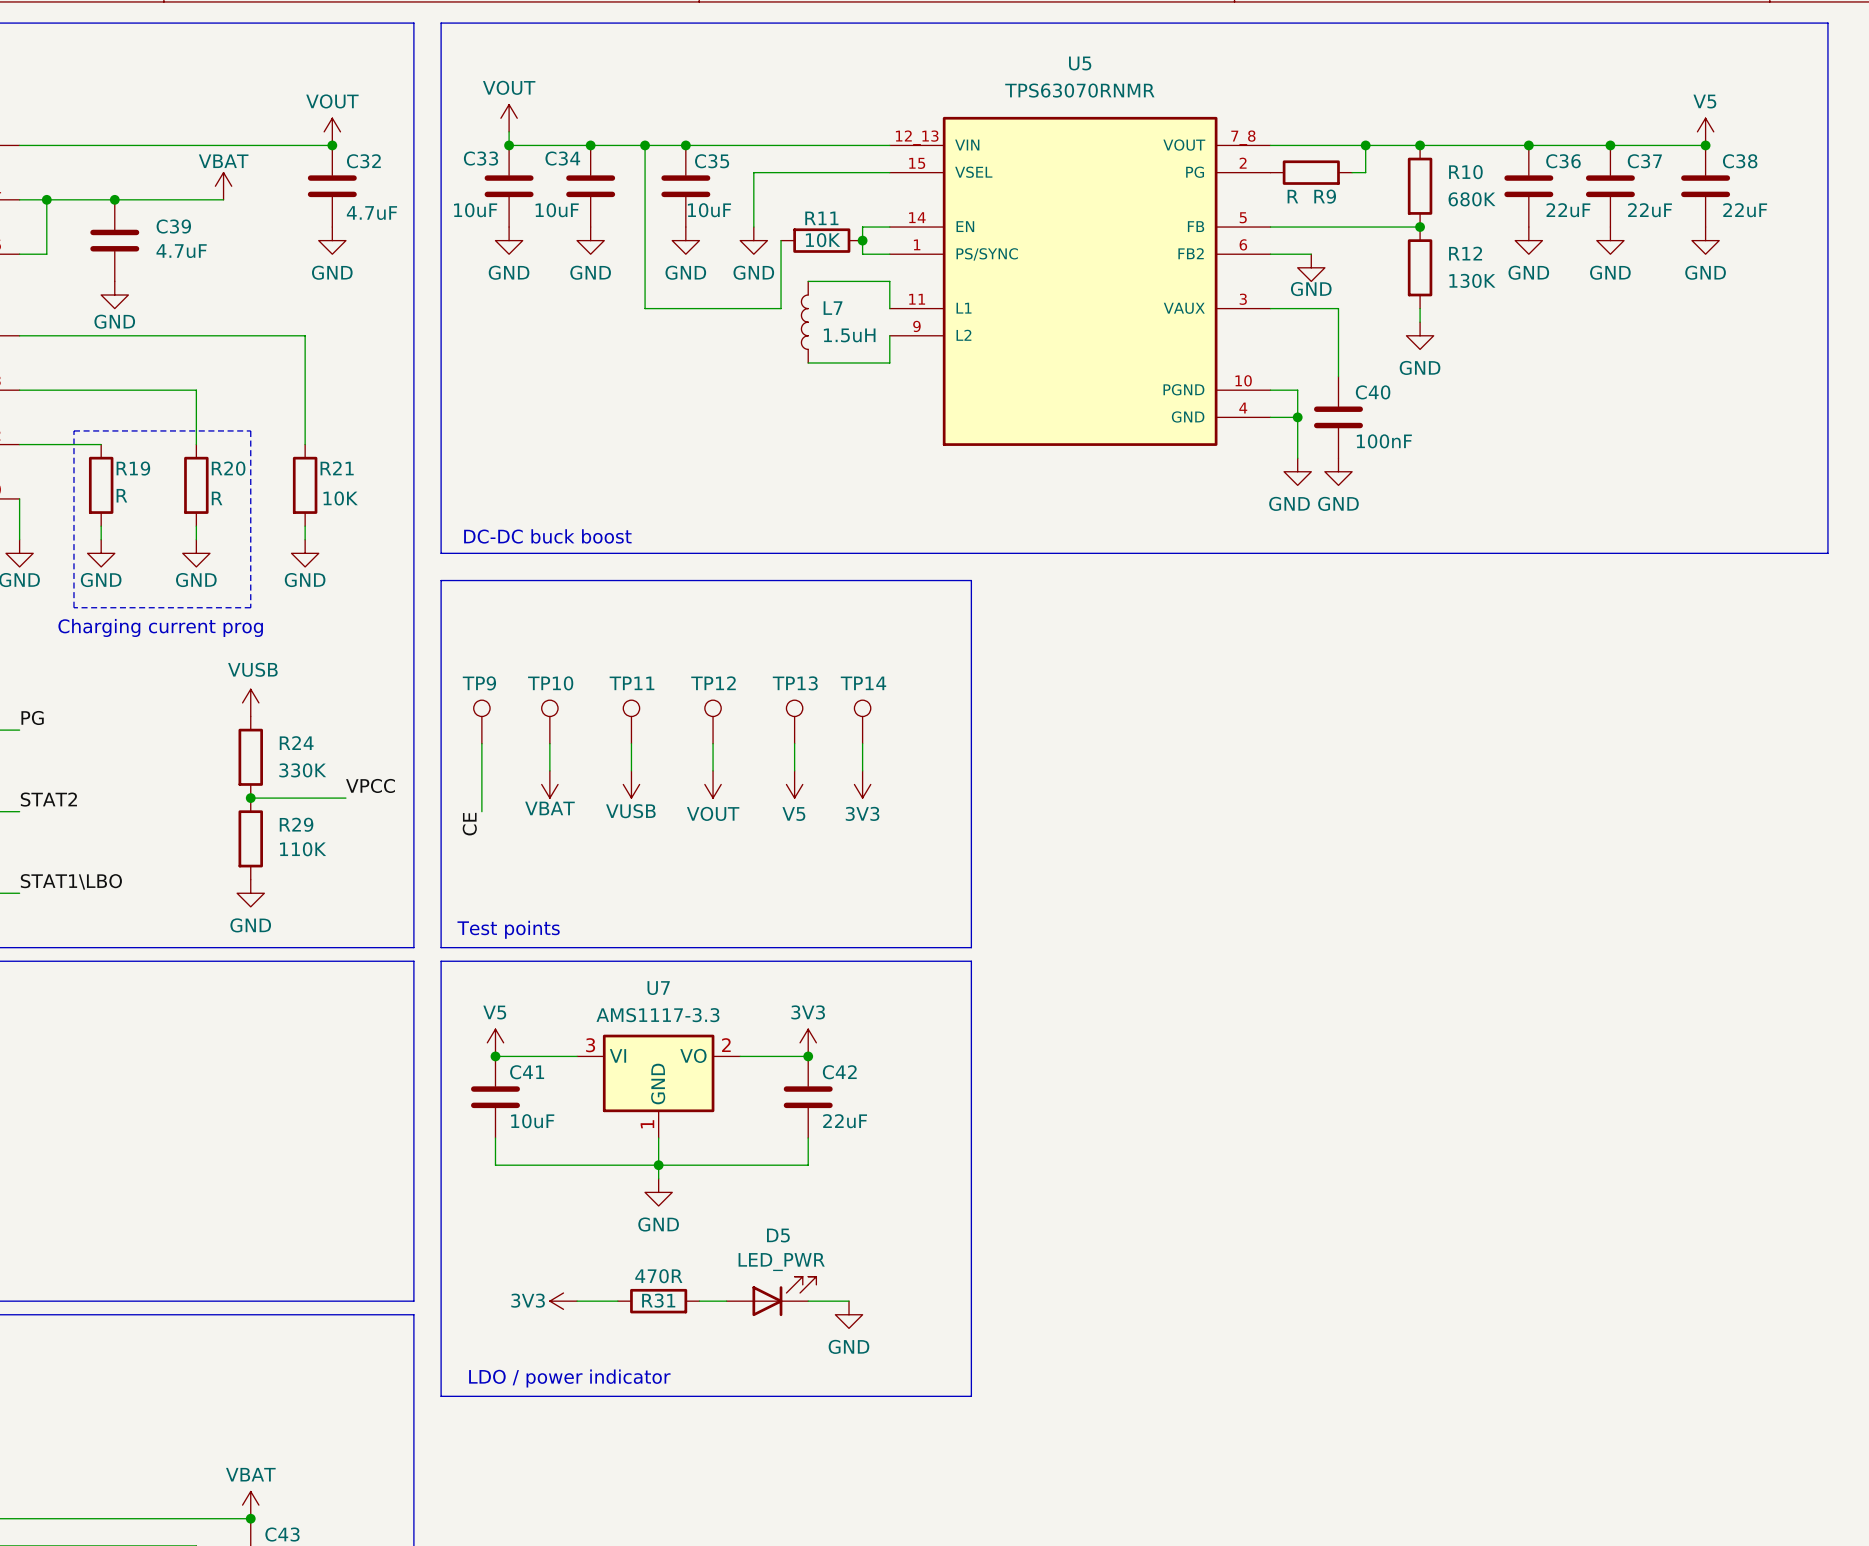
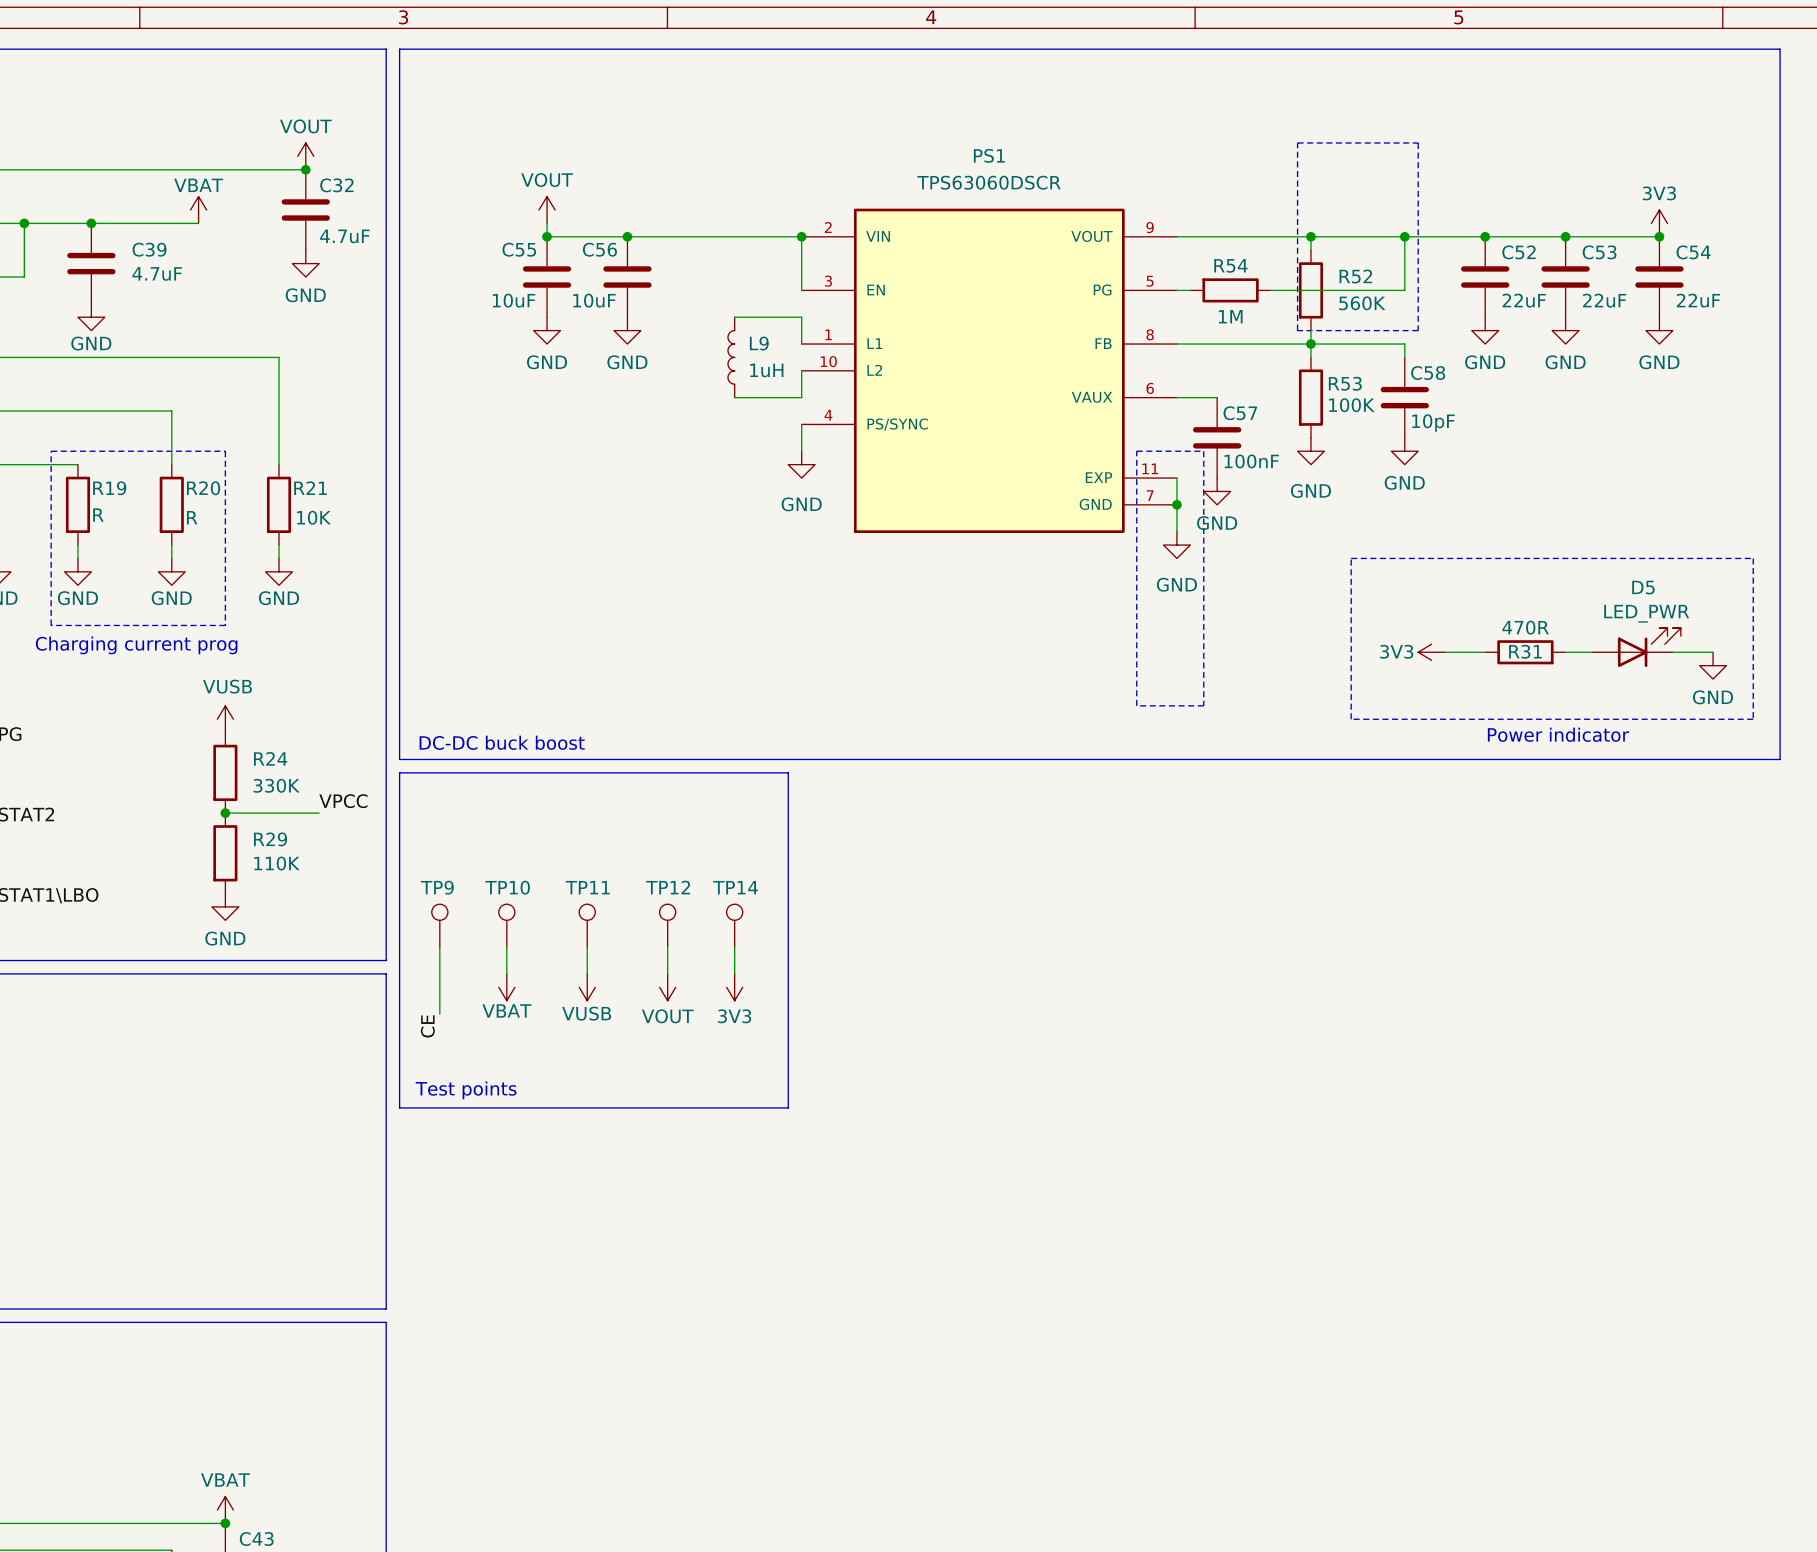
line: (441, 23) (441, 553) (1827, 553) -> (413, 49) (399, 49) (399, 759) (1780, 759) (1780, 571)
power symbol position: VOUT (509, 118) -> VOUT (547, 209)
line: none -> (1297, 142) (1418, 142) (1418, 330) (1297, 330) (1297, 142)
wire: (509, 131) (509, 145) (889, 145) -> none
power symbol: V5 (1705, 131) -> none
junction: (509, 145) -> none
junction: (590, 145) -> none
wire: (645, 145) (645, 308) (781, 308) (781, 240) -> none
junction: (645, 145) -> none
junction: (685, 145) -> none
wire: (1270, 145) (1705, 145) -> none
wire: (1365, 145) (1365, 172) (1352, 172) -> none
junction: (1365, 145) -> none
junction: (1420, 145) -> none
junction: (1528, 145) -> none
junction: (1610, 145) -> none
junction: (1705, 145) -> none
wire: (889, 172) (753, 172) (753, 227) -> none
R9: R (1311, 172) -> none
C33: 10uF (509, 186) -> none
C34: 10uF (590, 186) -> none
C35: 10uF (685, 186) -> none
R10: 680K (1420, 186) -> none
C36: 22uF (1528, 186) -> none
C37: 22uF (1610, 186) -> none
C38: 22uF (1705, 186) -> none
wire: none -> (547, 223) (547, 236) (801, 236) (801, 290)
power symbol: none -> 3V3 (1659, 223)
junction: none -> (547, 236)
junction: none -> (627, 236)
wire: none -> (1176, 236) (1659, 236)
junction: none -> (1310, 236)
wire: none -> (1404, 236) (1404, 290) (1270, 290)
junction: none -> (1485, 236)
junction: none -> (1565, 236)
junction: none -> (1659, 236)
wire: (889, 227) (862, 227) (862, 254) (889, 254) -> none
wire: (1270, 227) (1420, 227) -> none
junction position: (1420, 227) -> (1404, 236)
power symbol: GND (509, 240) -> none
power symbol: GND (590, 240) -> none
power symbol: GND (685, 240) -> none
power symbol: GND (753, 240) -> none
R11: 10K (821, 240) -> none
junction position: (862, 240) -> (801, 236)
power symbol: GND (1528, 240) -> none
power symbol: GND (1610, 240) -> none
power symbol: GND (1705, 240) -> none
C55: none -> 10uF (547, 277)
C56: none -> 10uF (627, 277)
wire: (1270, 254) (1311, 254) -> (1176, 397) (1217, 397)
C52: none -> 22uF (1485, 277)
C53: none -> 22uF (1565, 277)
C54: none -> 22uF (1659, 277)
wire: none -> (1176, 290) (1190, 290)
R54: none -> 1M (1230, 290)
power symbol: GND (1311, 267) -> none
R52: none -> 560K (1310, 290)
R12: 130K (1420, 267) -> none
wire: (808, 281) (889, 281) (889, 308) -> none
U5: TPS63070RNMR (1080, 281) -> none
wire: none -> (734, 317) (801, 317) (801, 344)
power symbol: none -> GND (547, 330)
power symbol: none -> GND (627, 330)
wire: (1270, 308) (1338, 308) (1338, 376) -> none
wire: none -> (1310, 330) (1310, 357)
wire: (1420, 308) (1420, 322) -> (1310, 236) (1310, 250)
power symbol: none -> GND (1485, 330)
power symbol: none -> GND (1565, 330)
power symbol: none -> GND (1659, 330)
L7: 1.5uH (804, 322) -> none
wire: none -> (1176, 344) (1404, 344) (1404, 357)
junction: none -> (1310, 344)
L9: none -> 1uH (731, 357)
wire: (889, 335) (889, 362) (808, 362) -> none
power symbol: GND (1420, 335) -> none
wire: none -> (801, 370) (801, 397) (734, 397)
PS1: none -> TPS63060DSCR (989, 370)
R53: none -> 100K (1310, 397)
C58: none -> 10pF (1404, 397)
wire: (1270, 390) (1297, 390) (1297, 458) -> none
wire: none -> (801, 424) (801, 451)
C57: none -> 100nF (1217, 437)
wire: (1270, 417) (1297, 417) -> none
junction: (1297, 417) -> none
C40: 100nF (1338, 417) -> none
line: none -> (1136, 451) (1203, 451) (1203, 705) (1136, 705) (1136, 451)
power symbol: none -> GND (1310, 451)
power symbol: none -> GND (1404, 451)
power symbol: none -> GND (801, 464)
wire: none -> (1176, 478) (1176, 531)
power symbol: none -> GND (1217, 491)
power symbol: GND (1297, 471) -> none
power symbol: GND (1338, 471) -> none
junction: none -> (1176, 504)
power symbol: none -> GND (1176, 545)
text position: DC-DC buck boost (547, 536) -> DC-DC buck boost (502, 742)
line: none -> (1351, 558) (1753, 558) (1753, 719) (1351, 719) (1351, 558)
line: (441, 580) (971, 580) (971, 947) (441, 947) (441, 580) -> none
power symbol: none -> 3V3 (1431, 652)
wire: none -> (1444, 652) (1485, 652)
wire: none -> (1565, 652) (1592, 652)
wire: none -> (1672, 652) (1713, 652)
power symbol: none -> GND (1713, 665)
text: none -> Power indicator (1558, 734)
TP9 position: (481, 721) -> (439, 925)
TP10 position: (549, 721) -> (506, 925)
TP11 position: (631, 721) -> (587, 925)
TP12 position: (713, 721) -> (667, 925)
TP13: (794, 721) -> none
TP14 position: (862, 721) -> (734, 925)
wire: (481, 743) (481, 811) -> (439, 947) (439, 1014)
wire: (549, 743) (549, 770) -> (506, 947) (506, 973)
wire: (631, 743) (631, 770) -> (587, 947) (587, 973)
wire: (713, 743) (713, 770) -> (667, 947) (667, 973)
wire: (794, 743) (794, 770) -> none
wire: (862, 743) (862, 770) -> (734, 947) (734, 973)
line: none -> (399, 772) (788, 772) (788, 1107) (399, 1107) (399, 772)
power symbol position: VBAT (549, 784) -> VBAT (506, 987)
power symbol position: VUSB (631, 784) -> VUSB (587, 987)
power symbol position: VOUT (713, 784) -> VOUT (667, 987)
power symbol: V5 (794, 784) -> none
power symbol: 3V3 (862, 784) -> none
label position: CE (469, 824) -> CE (427, 1026)
text position: Test points (508, 929) -> Test points (466, 1090)
line: (441, 961) (441, 1396) (971, 1396) (971, 961) (441, 961) -> none
power symbol: V5 (495, 1042) -> none
power symbol rotation: 0° (808, 1042) -> 180° (734, 987)
power symbol position: 3V3 (808, 1042) -> 3V3 (734, 987)
wire: (495, 1056) (577, 1056) -> none
junction: (495, 1056) -> none
wire: (740, 1056) (808, 1056) -> none
junction: (808, 1056) -> none
U7: AMS1117-3.3 (658, 1086) -> none
C41: 10uF (495, 1097) -> none
C42: 22uF (808, 1097) -> none
wire: (495, 1138) (495, 1165) (808, 1165) (808, 1138) -> none
wire: (658, 1138) (658, 1178) -> none
junction: (658, 1165) -> none
power symbol: GND (658, 1192) -> none
D5 position: (771, 1296) -> (1636, 647)
power symbol: 3V3 (563, 1301) -> none
wire: (577, 1301) (617, 1301) -> none
R31 position: (658, 1301) -> (1525, 652)
wire: (699, 1301) (726, 1301) -> none
wire: (808, 1301) (849, 1301) -> none
power symbol: GND (849, 1314) -> none
text: LDO / power indicator (569, 1378) -> none

